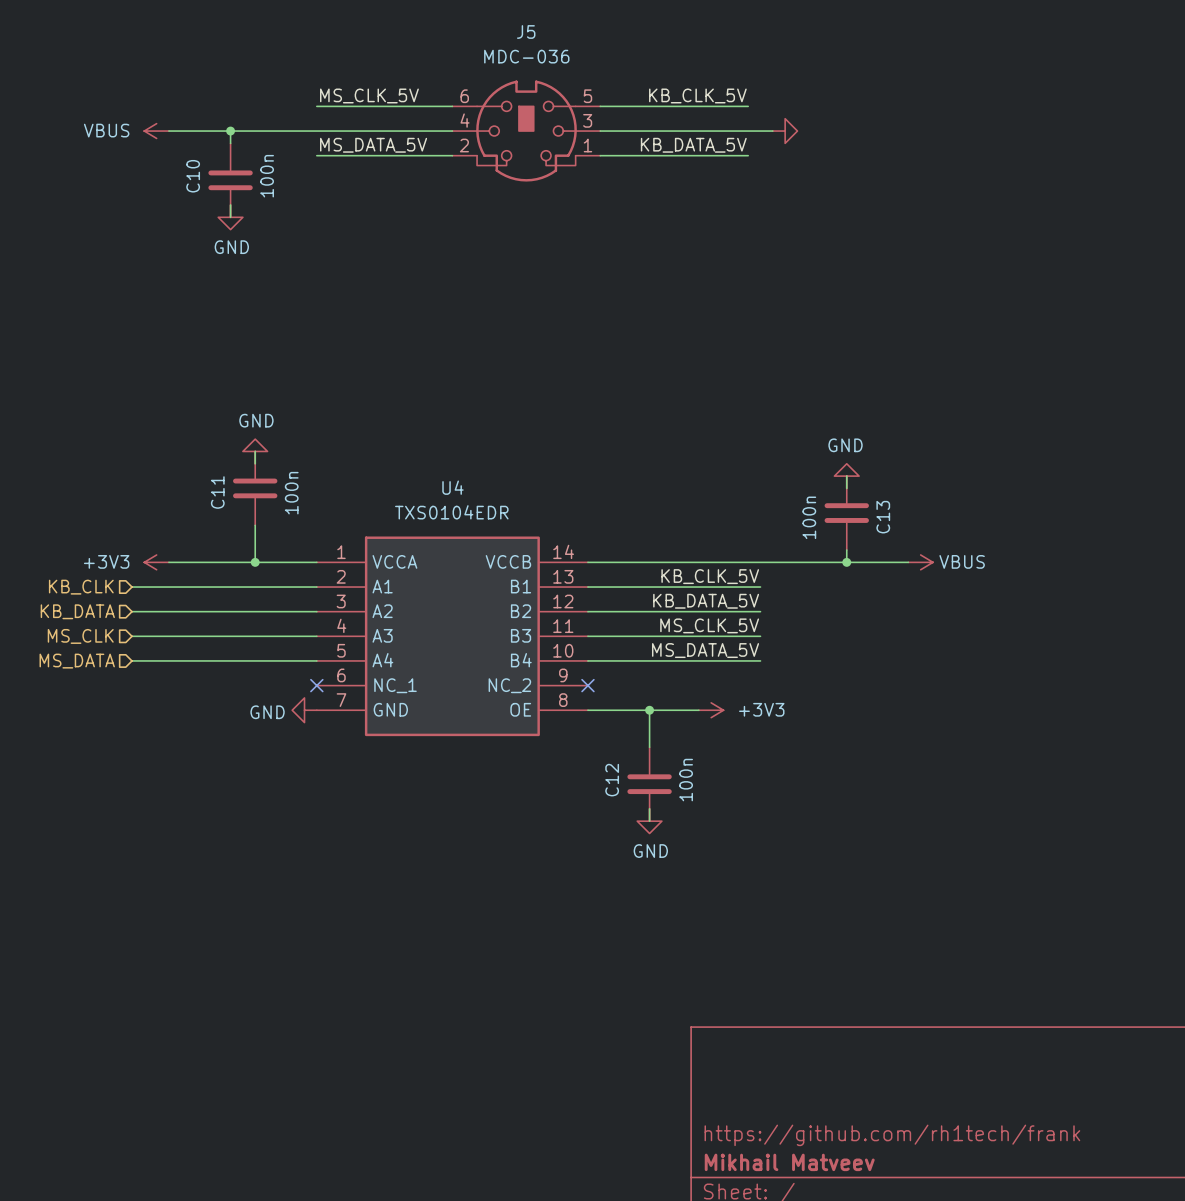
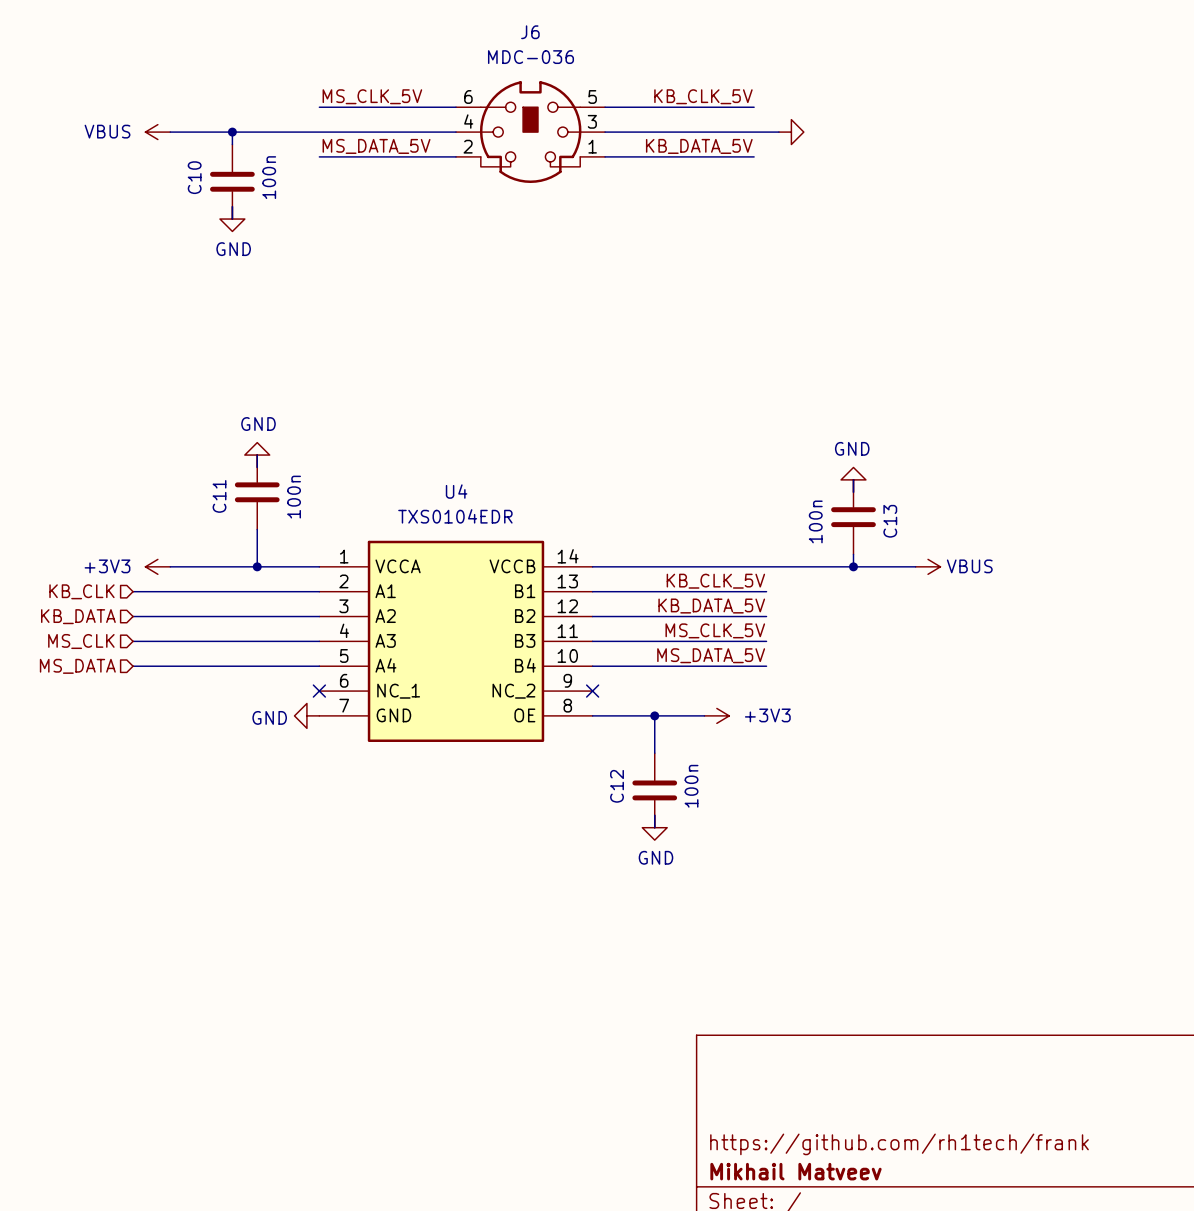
J5 name: J5 (526, 31) -> J6 (530, 32)

